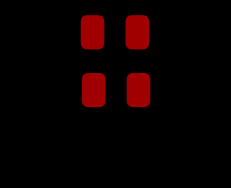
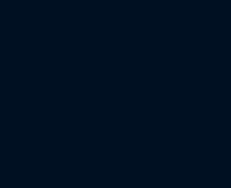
part: (114, 32) -> none
part: (116, 90) -> none

